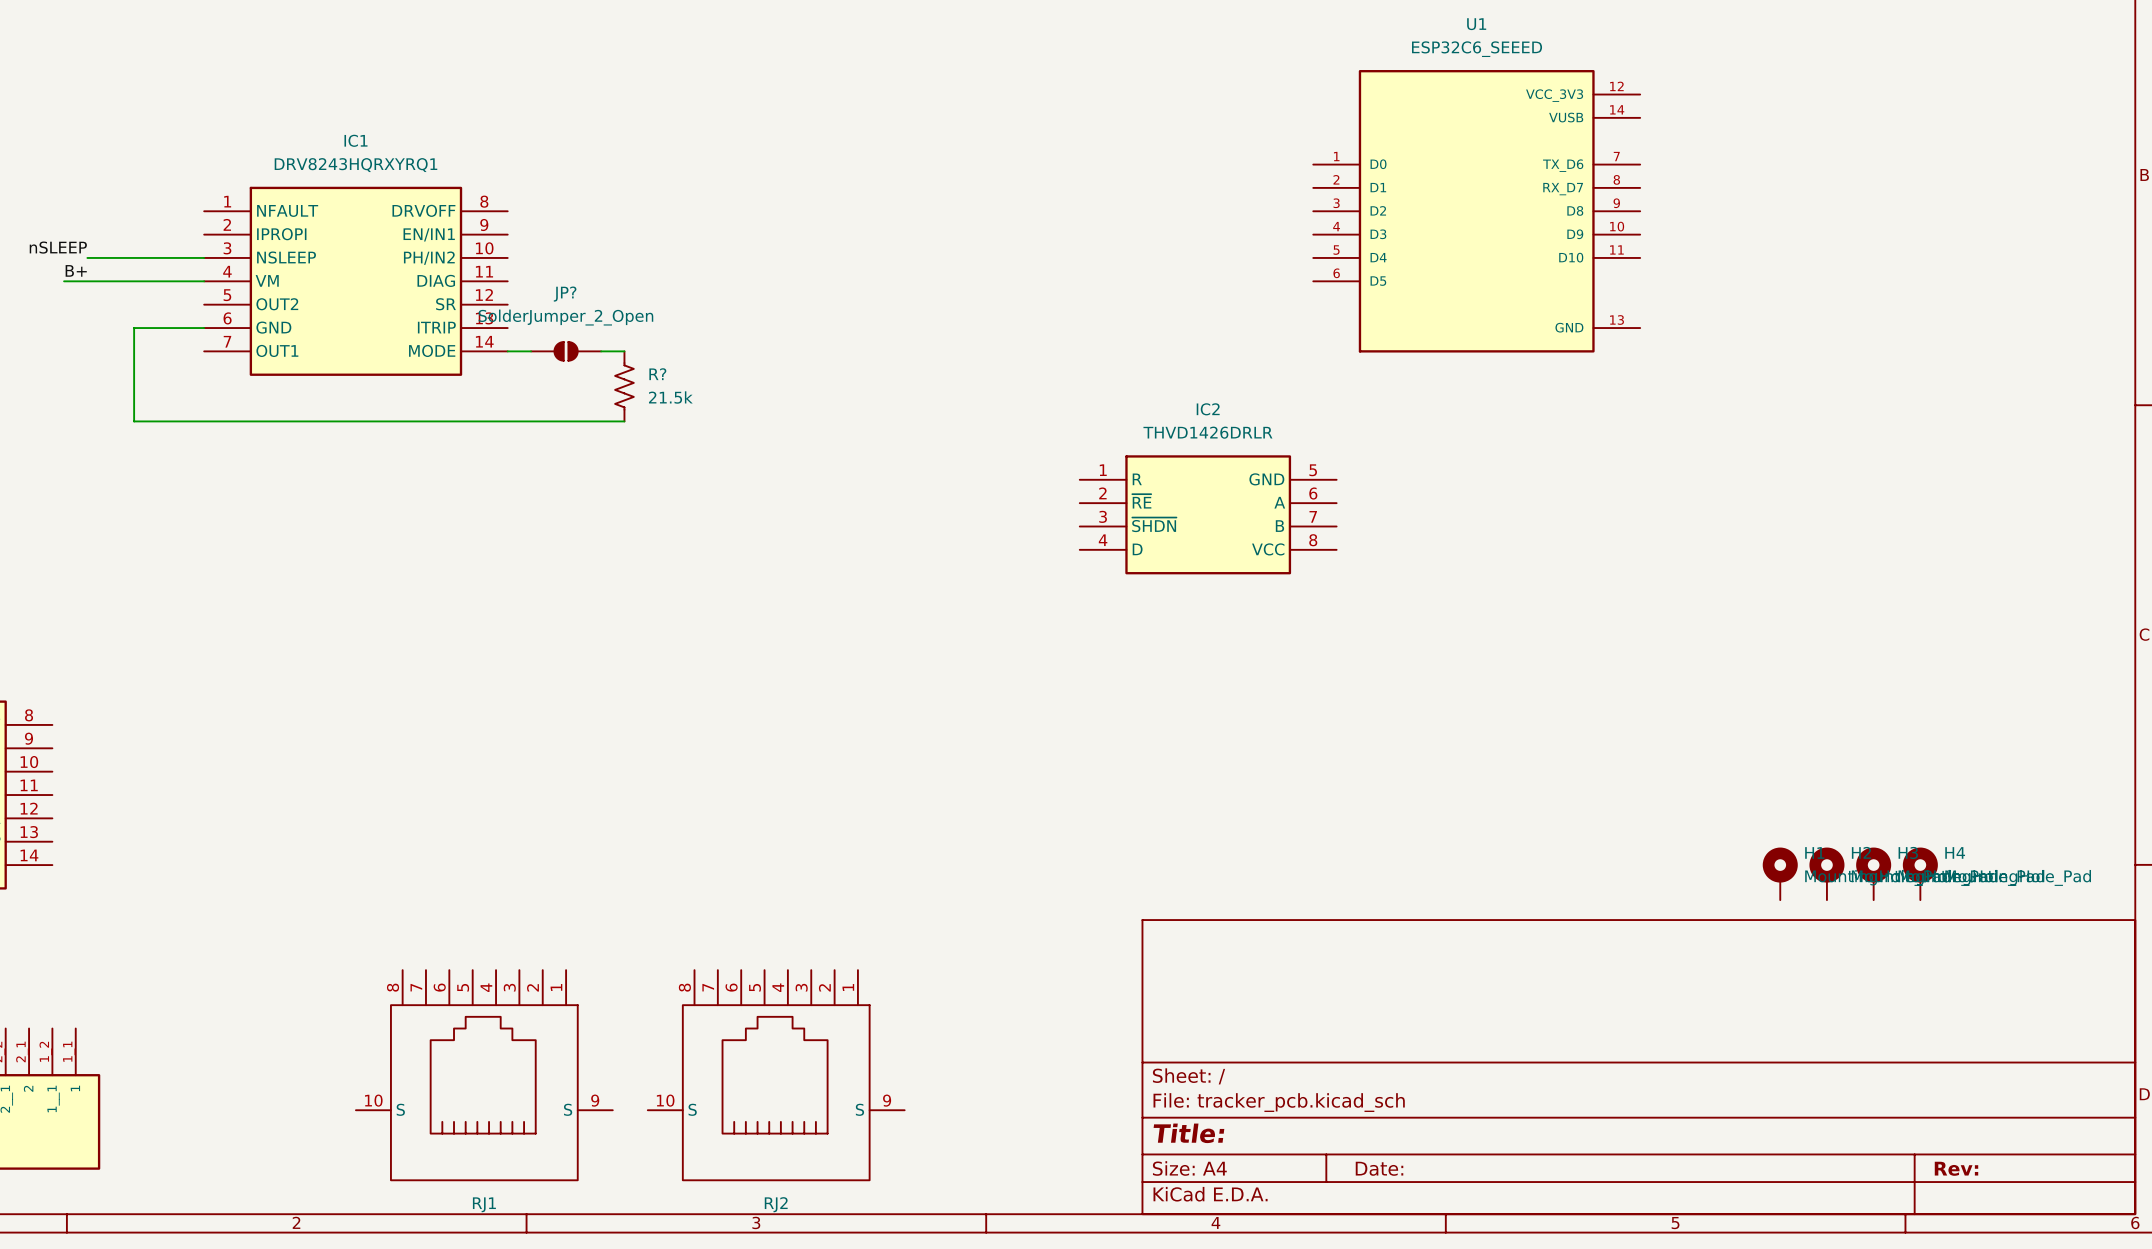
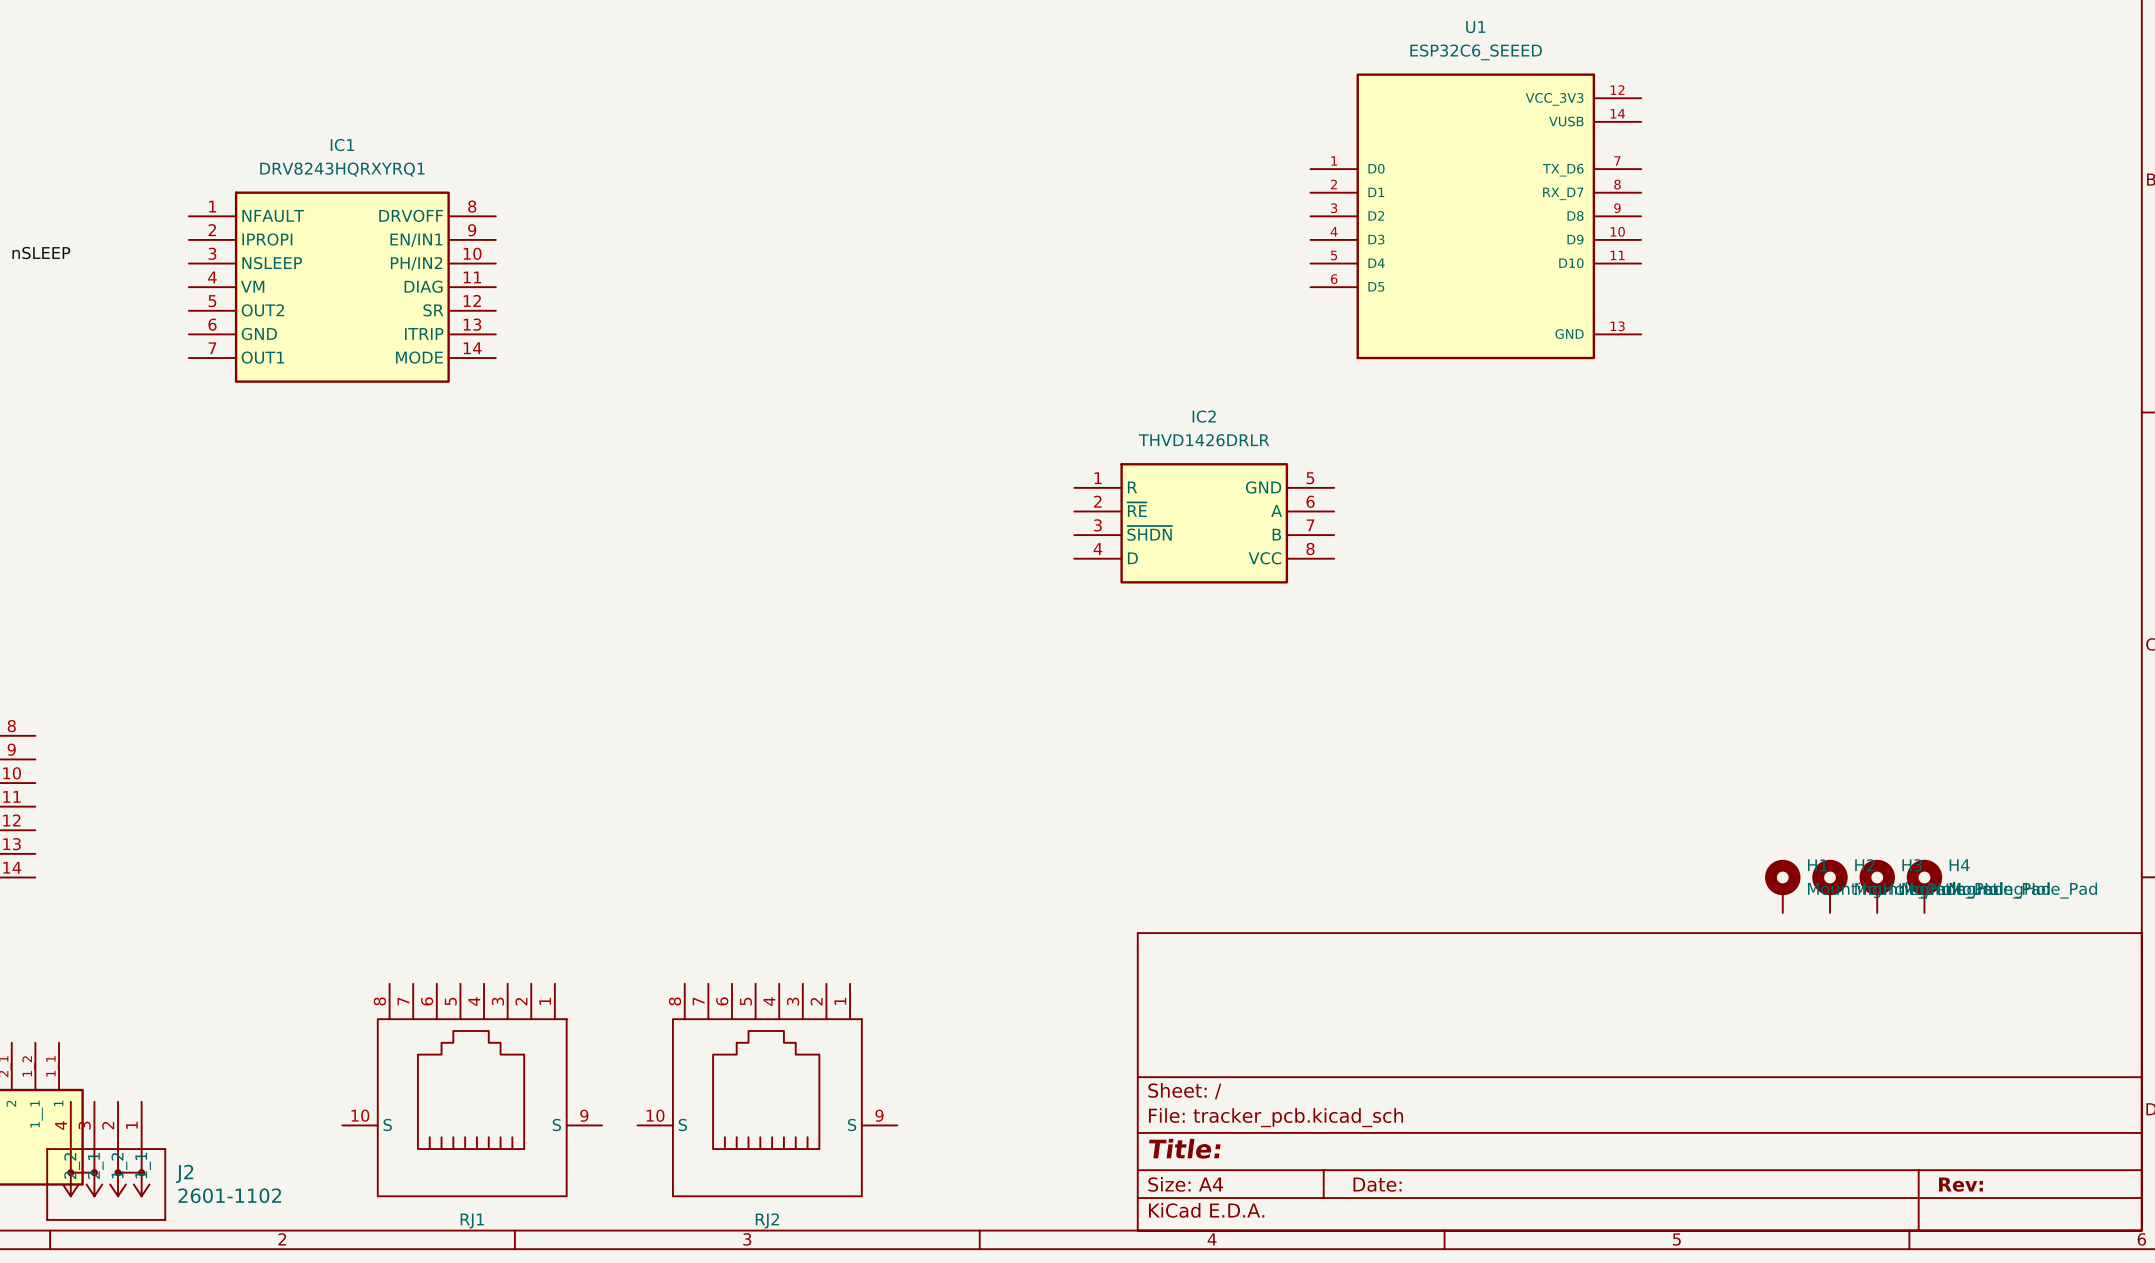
wire: (87, 257) (204, 257) -> none
label: B+ (76, 270) -> none
wire: (64, 281) (204, 281) -> none
wire: (204, 328) (134, 328) (134, 421) (624, 421) -> none
wire: (507, 351) (531, 351) -> none
JP?: SolderJumper_2_Open (566, 351) -> none
wire: (601, 351) (624, 351) -> none
R?: 21.5k (624, 386) -> none
J2: none -> 2601-1102 (106, 1161)

